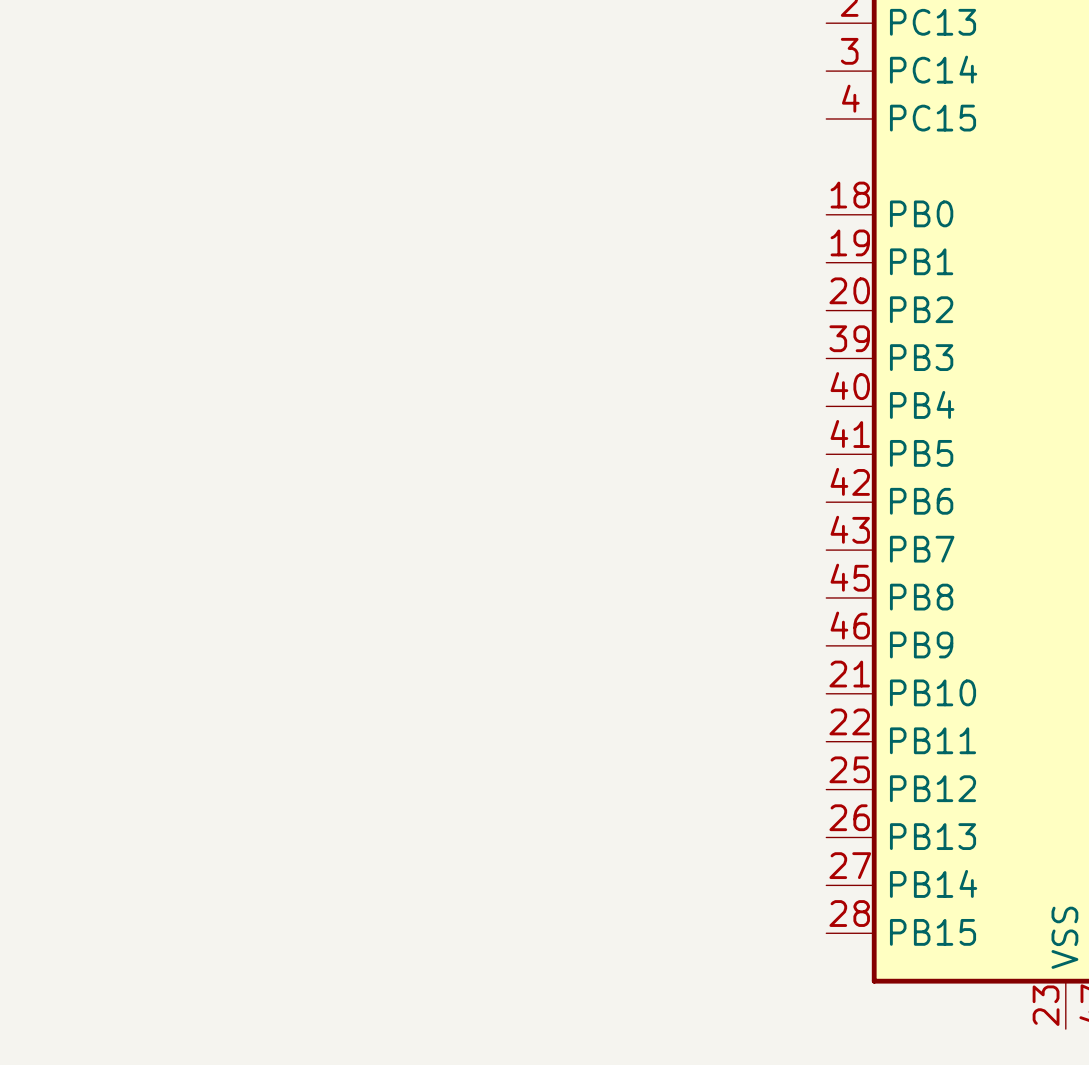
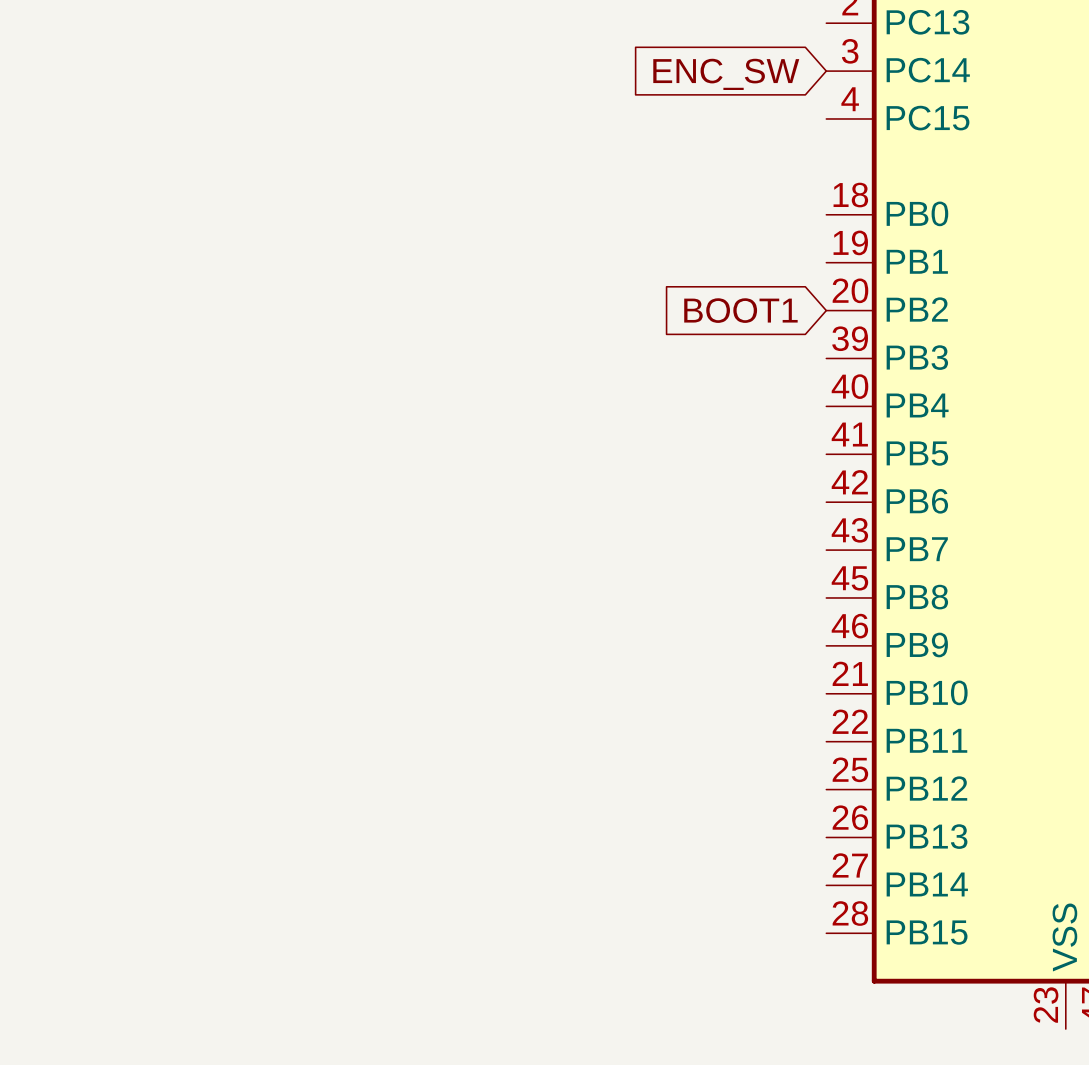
global label: none -> ENC_SW (726, 74)
global label: none -> BOOT1 (740, 310)

